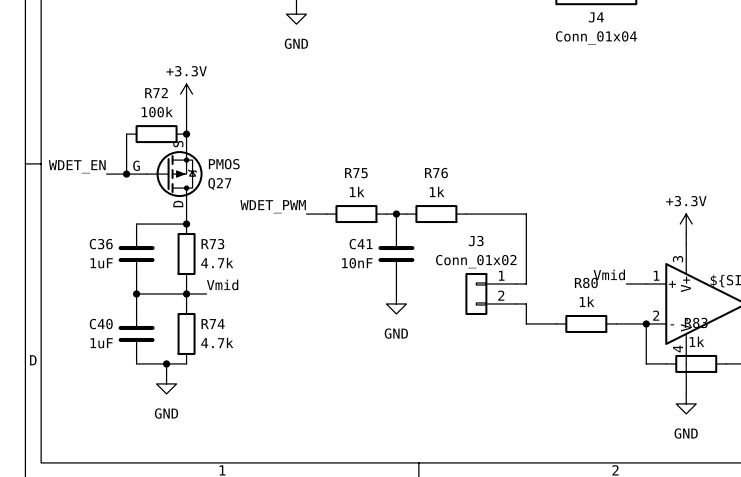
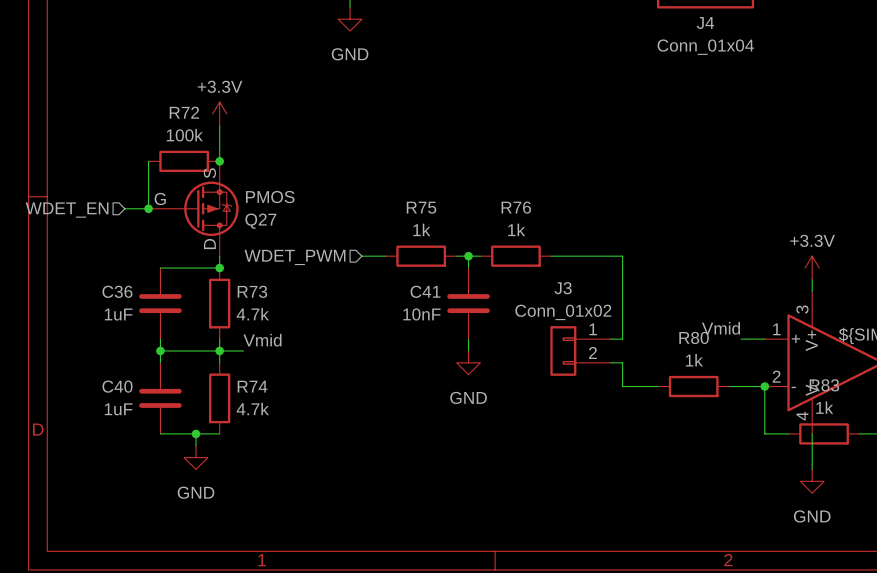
label: WDET_EN (77, 166) -> none
hierarchical label: none -> WDET_EN (67, 210)
label: WDET_PWM (273, 206) -> none
hierarchical label: none -> WDET_PWM (294, 257)

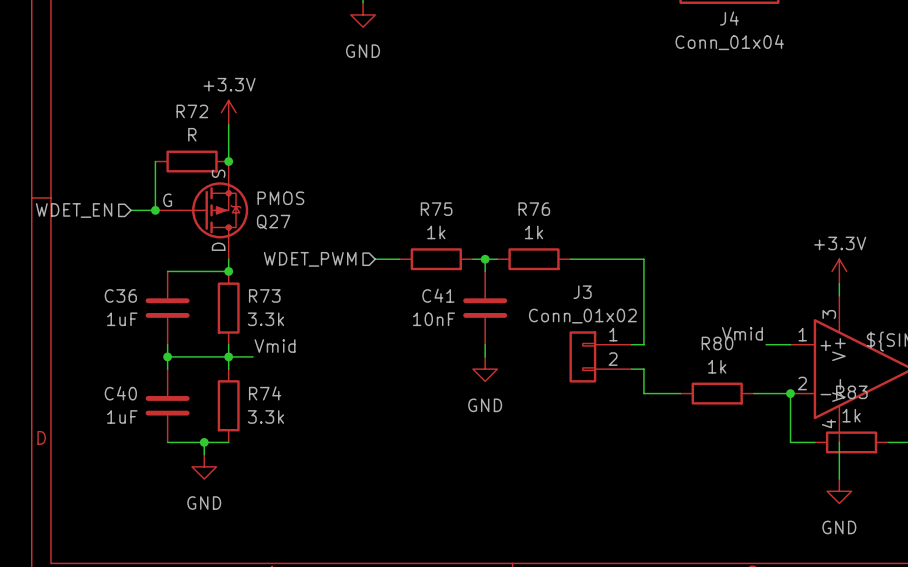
R72 value: 100k (184, 135) -> R (192, 134)
R73 value: 4.7k (252, 314) -> 3.3k (265, 319)
R74 value: 4.7k (252, 408) -> 3.3k (265, 416)

